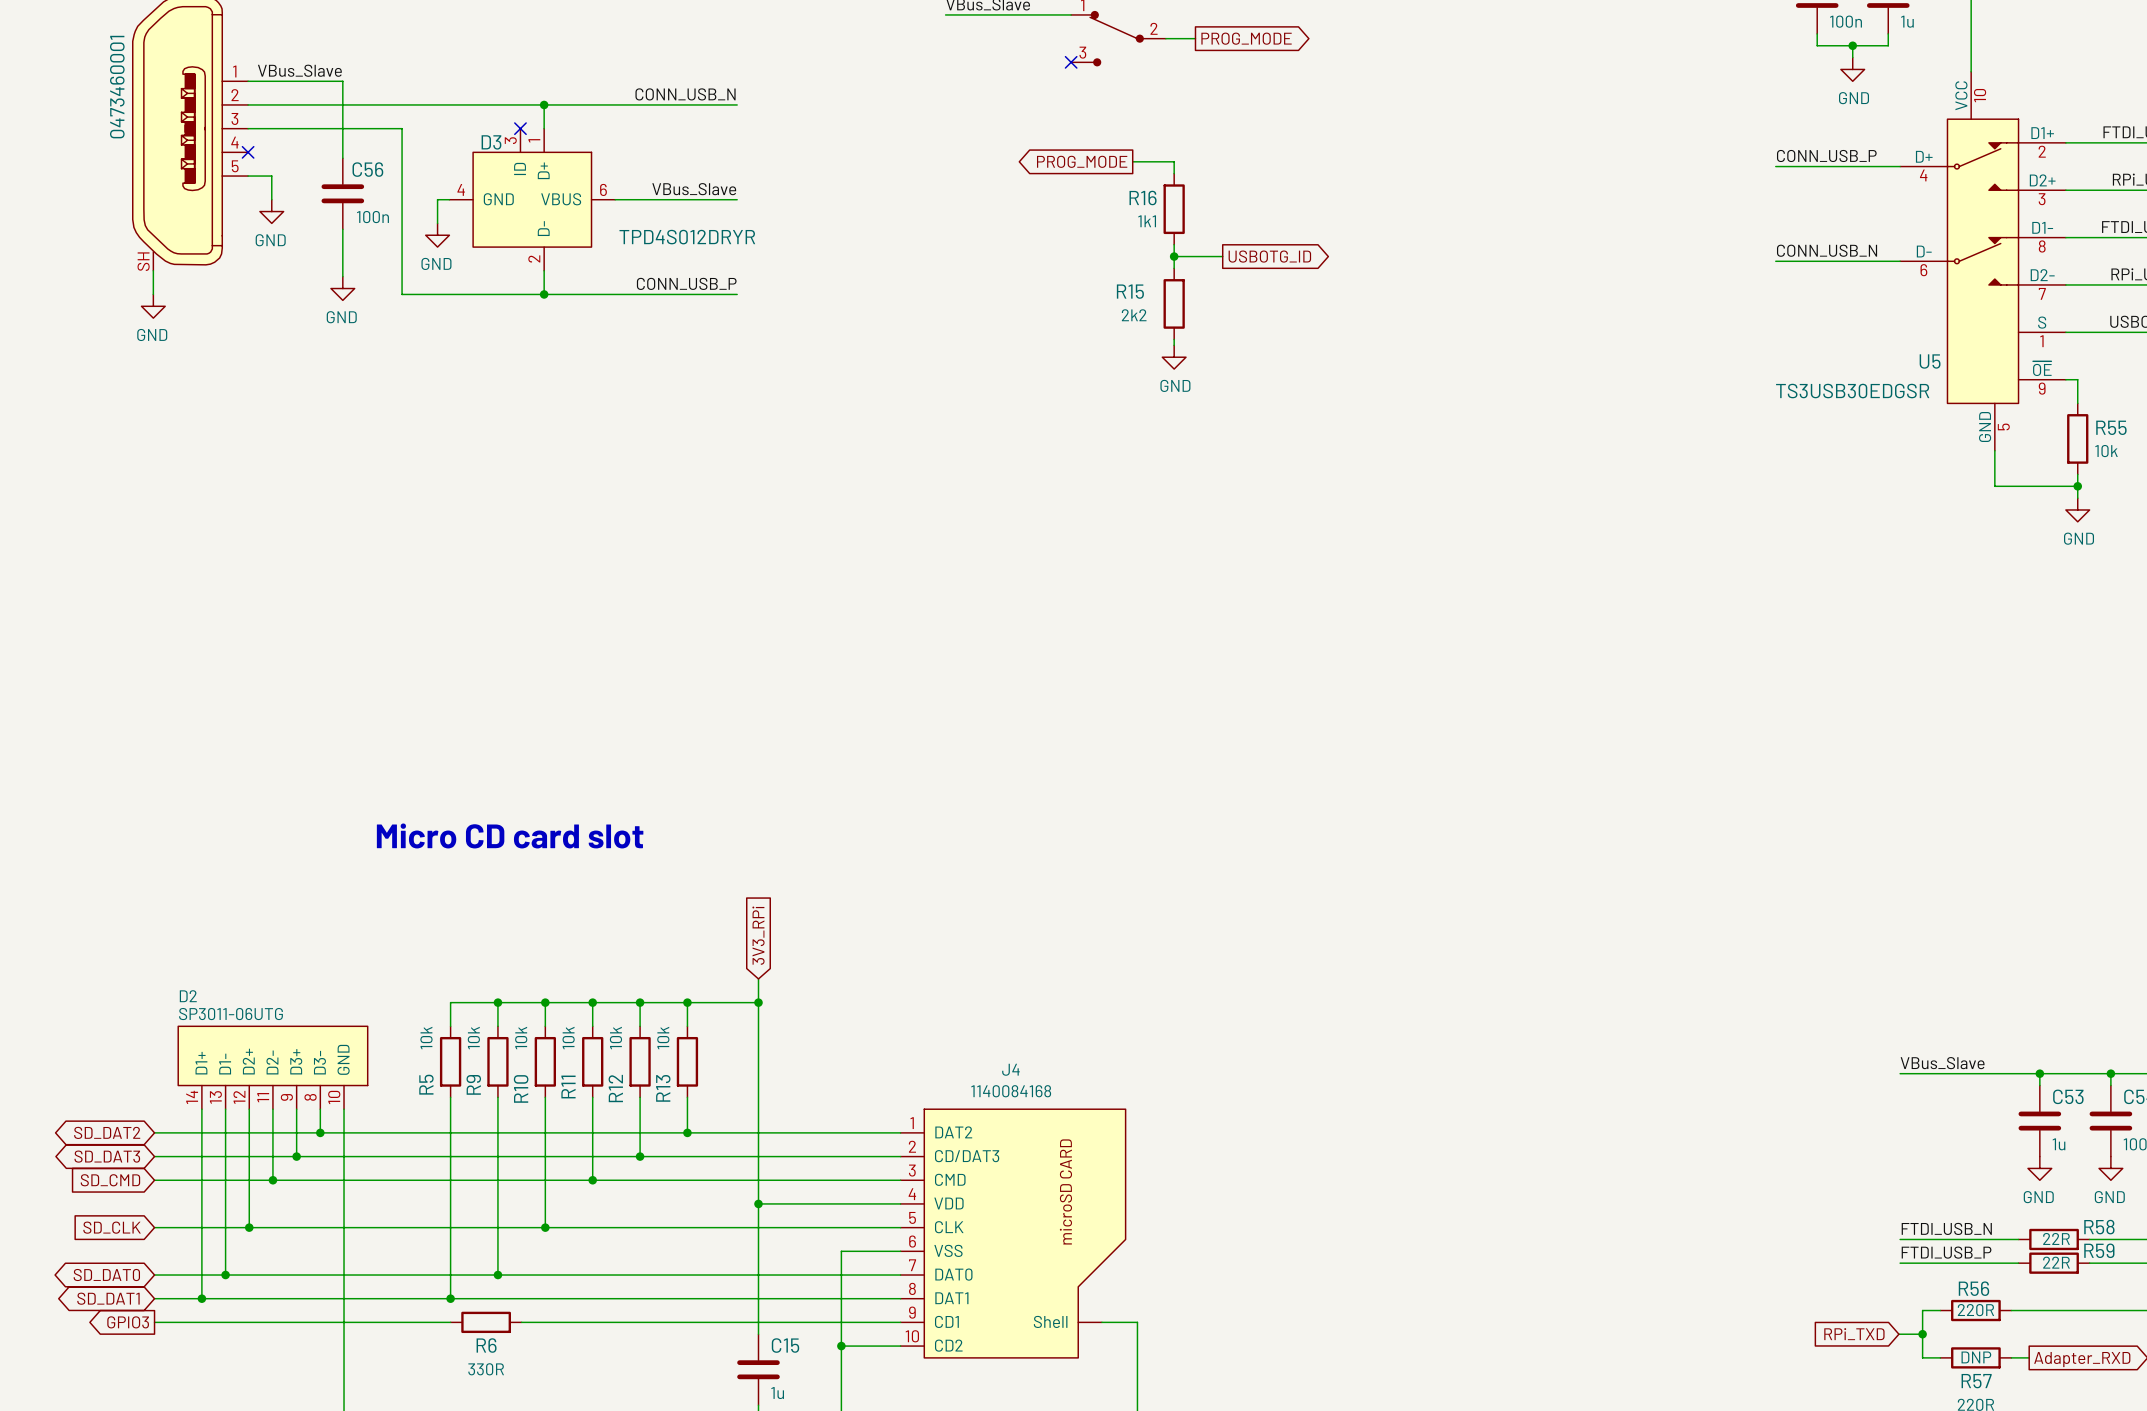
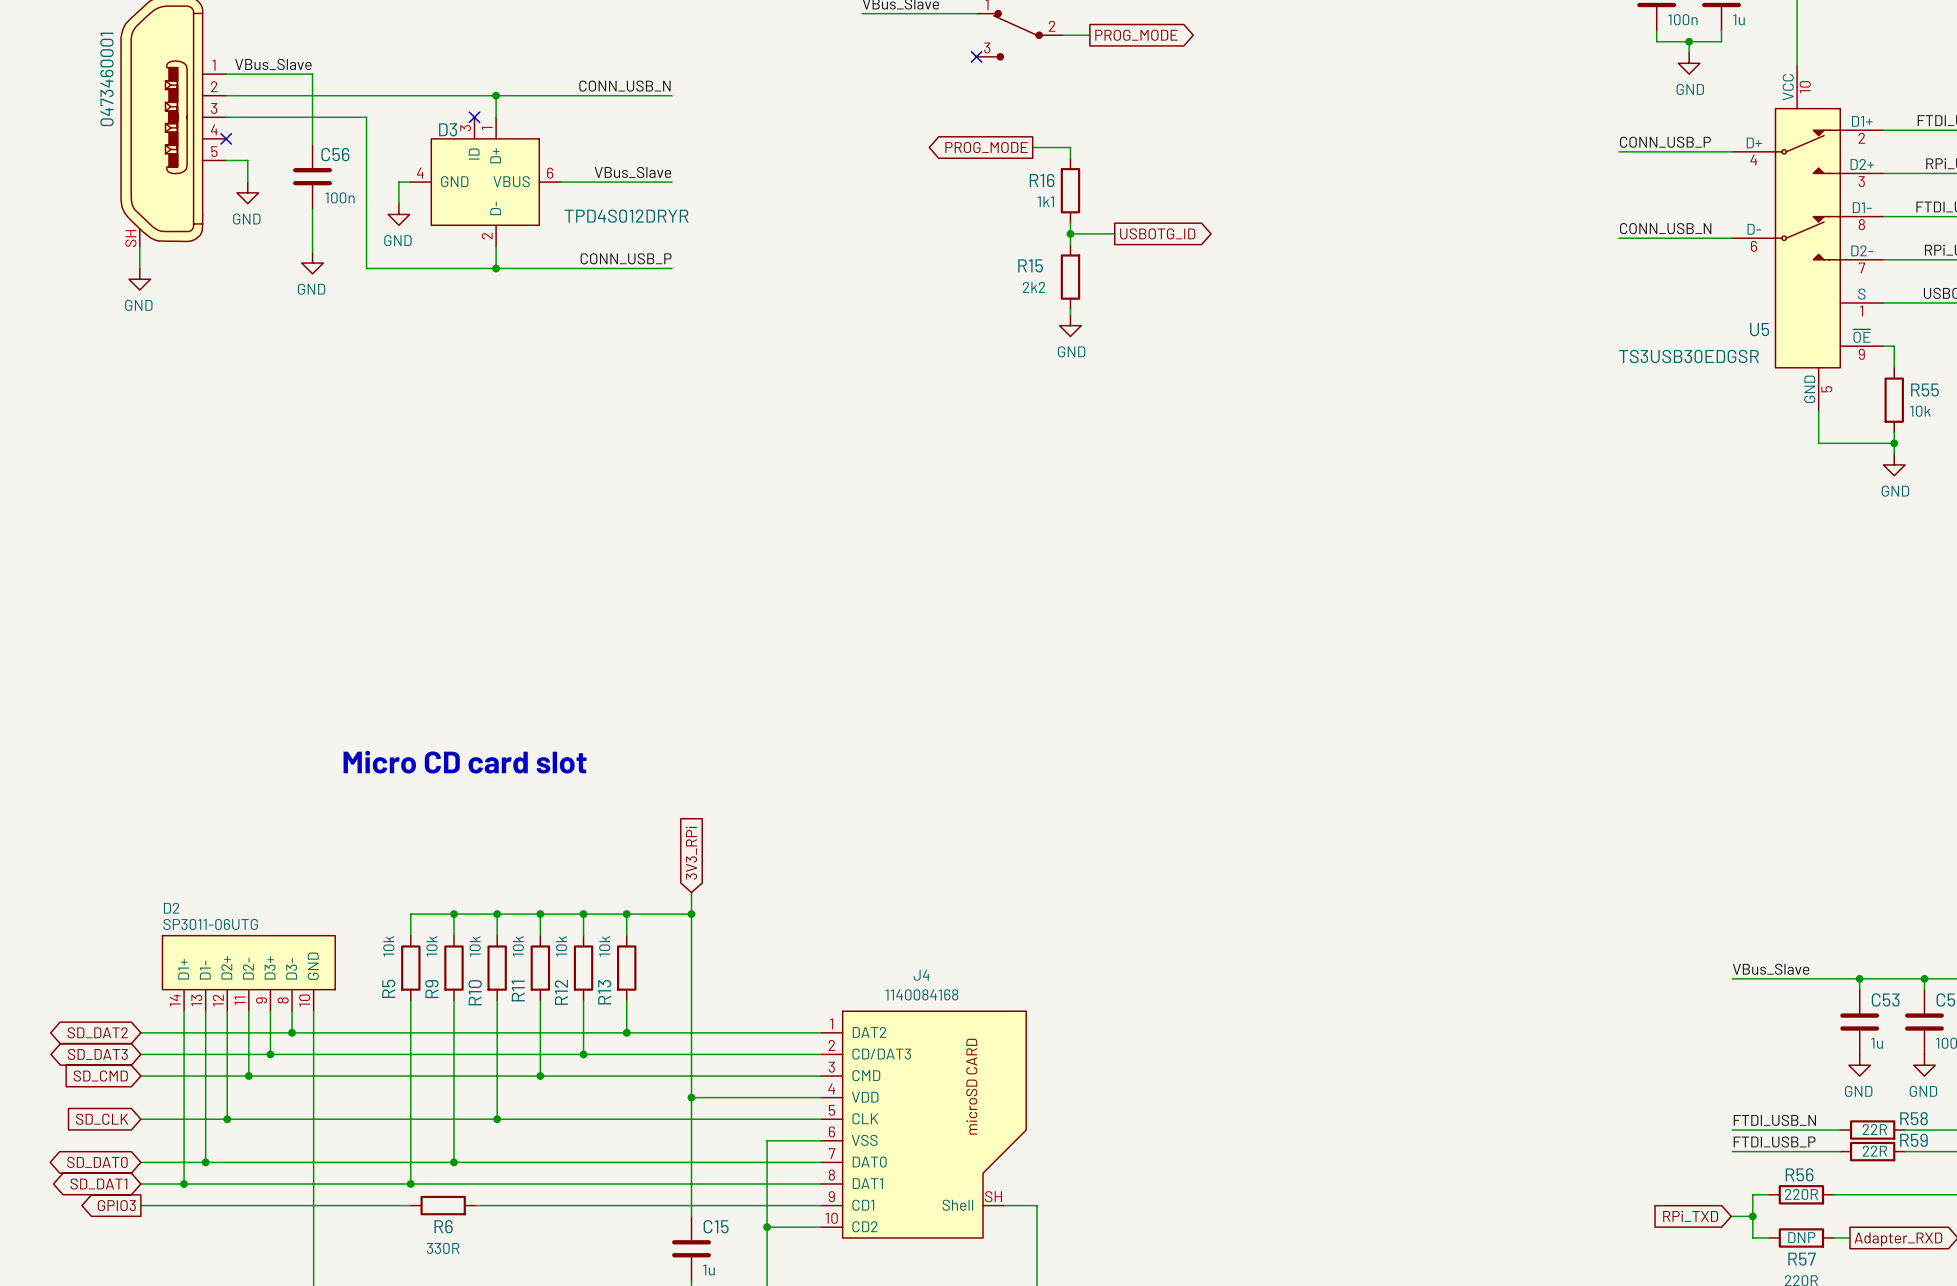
J4 pin number: none -> SH (993, 1196)

